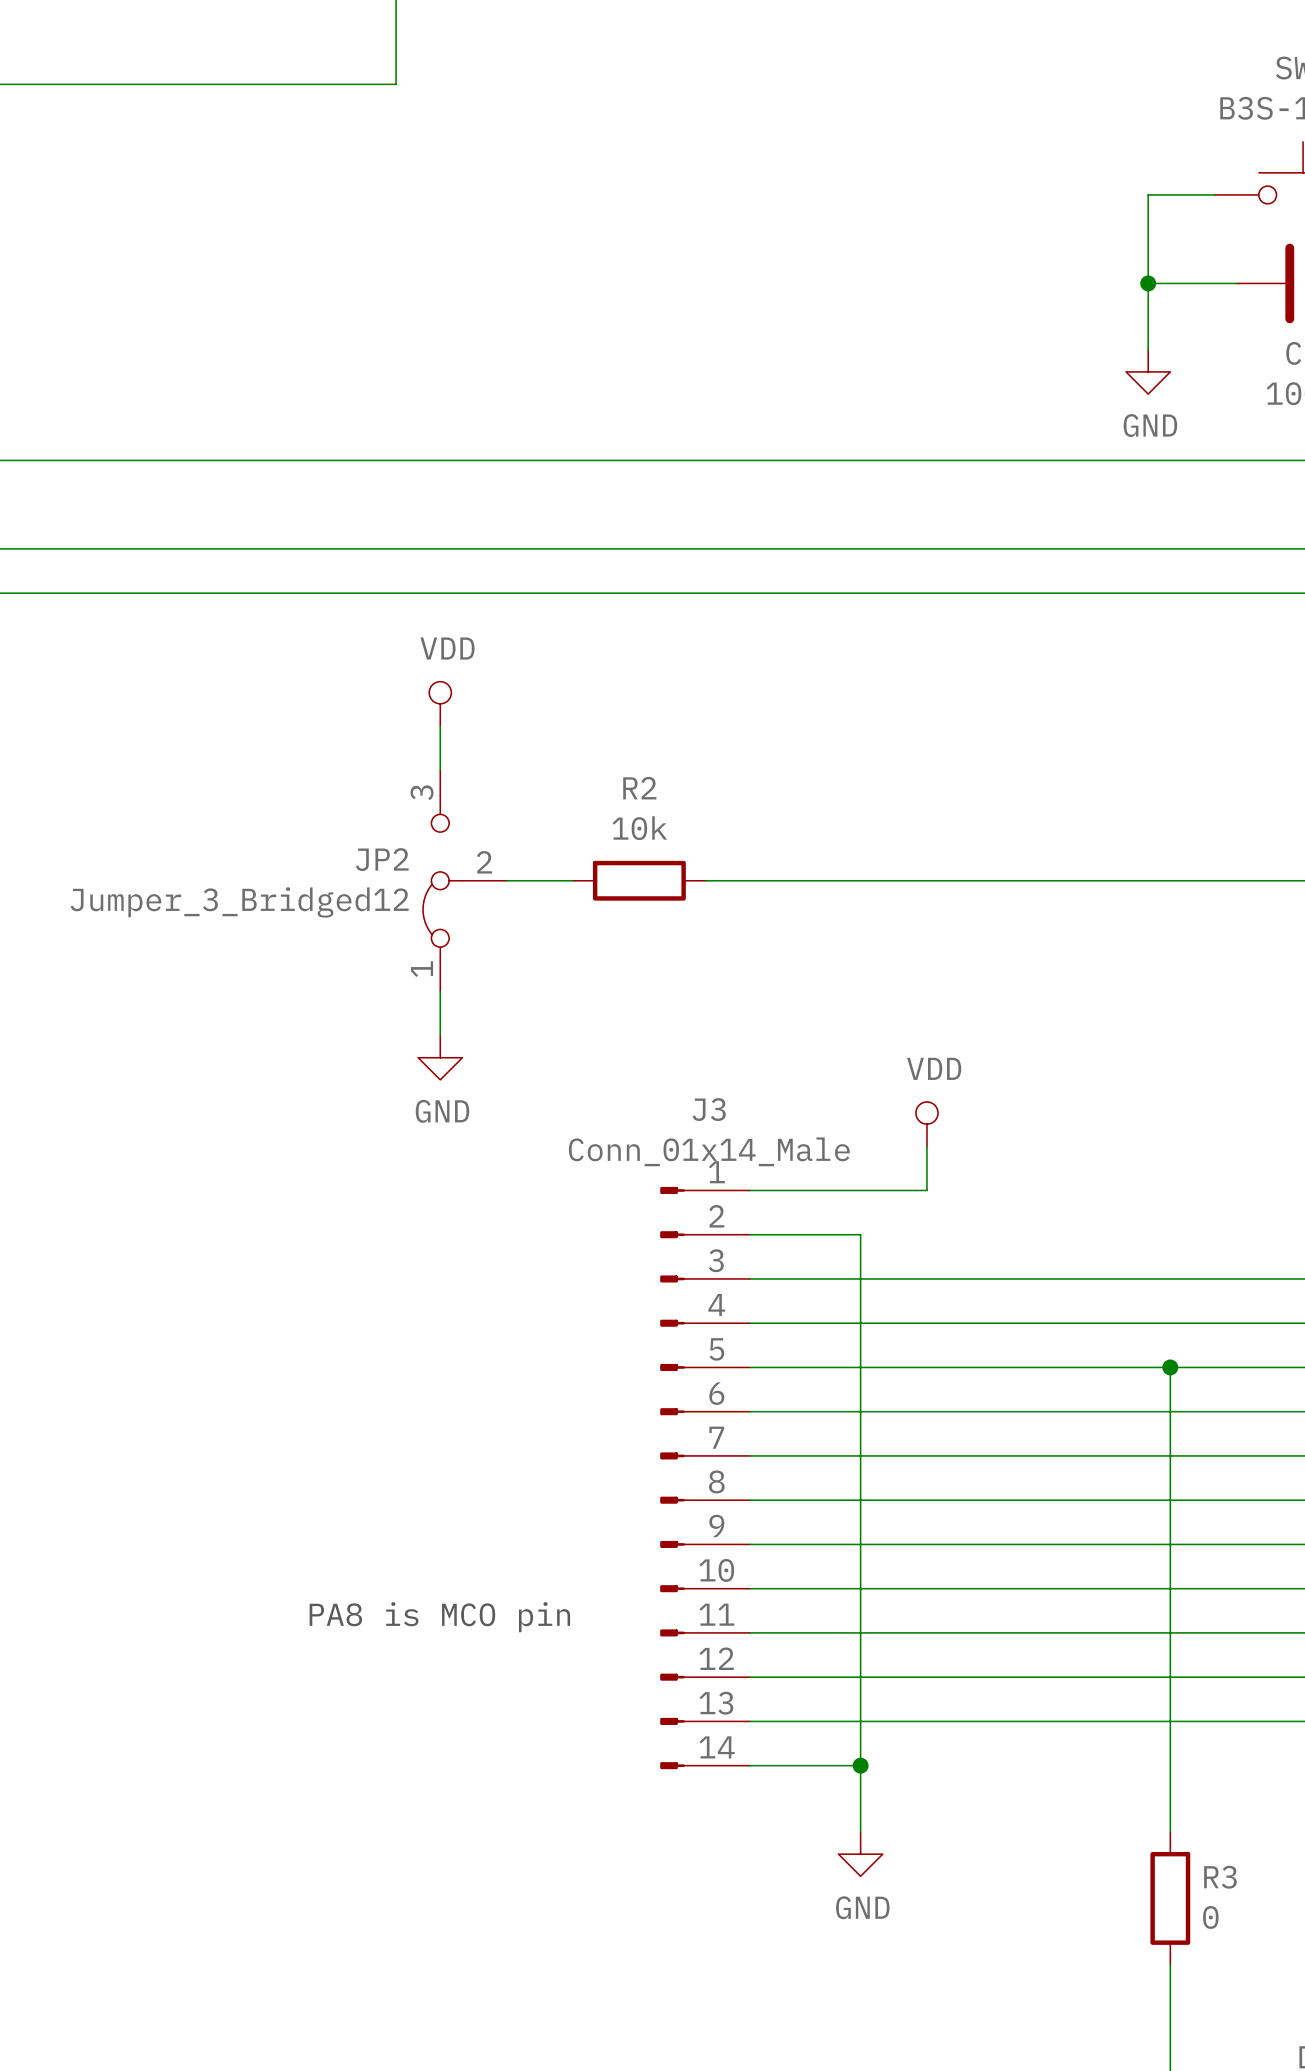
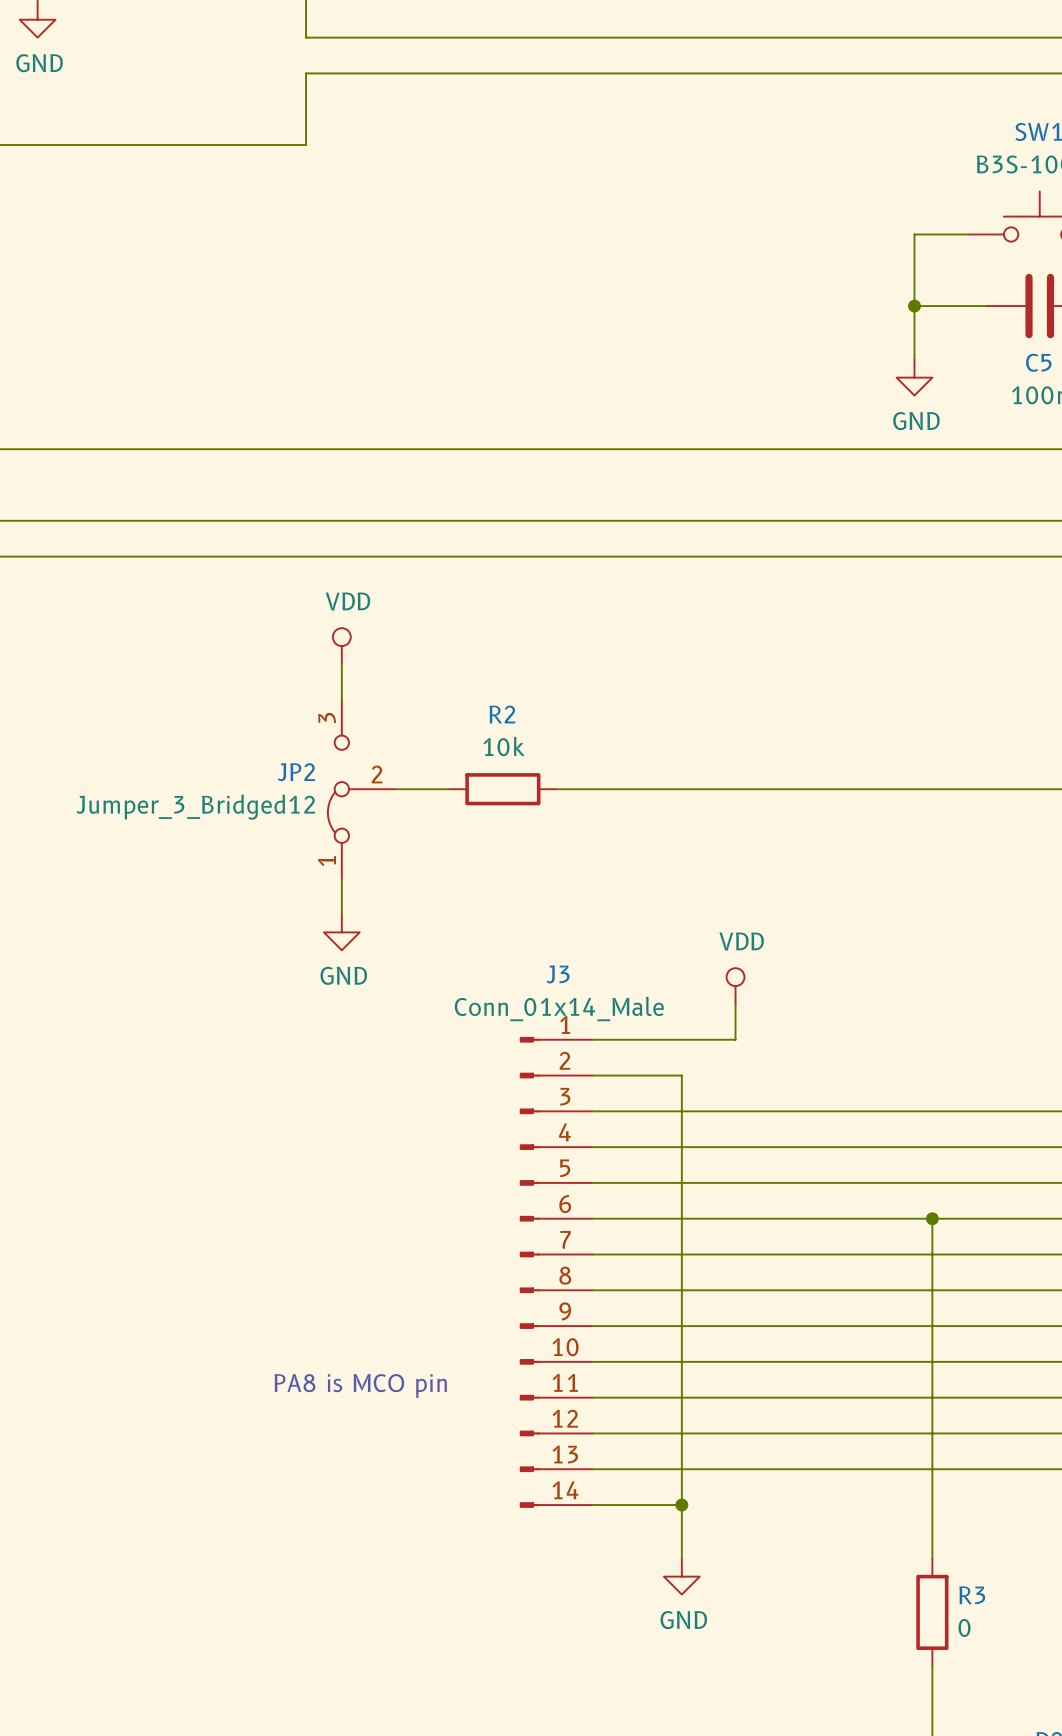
wire: (1170, 1367) (1170, 1411) -> none
junction position: (1170, 1367) -> (932, 1218)

